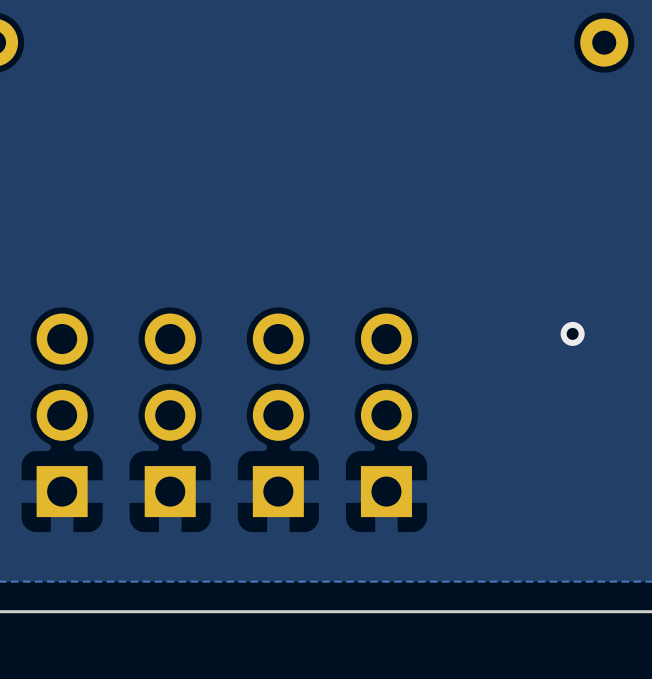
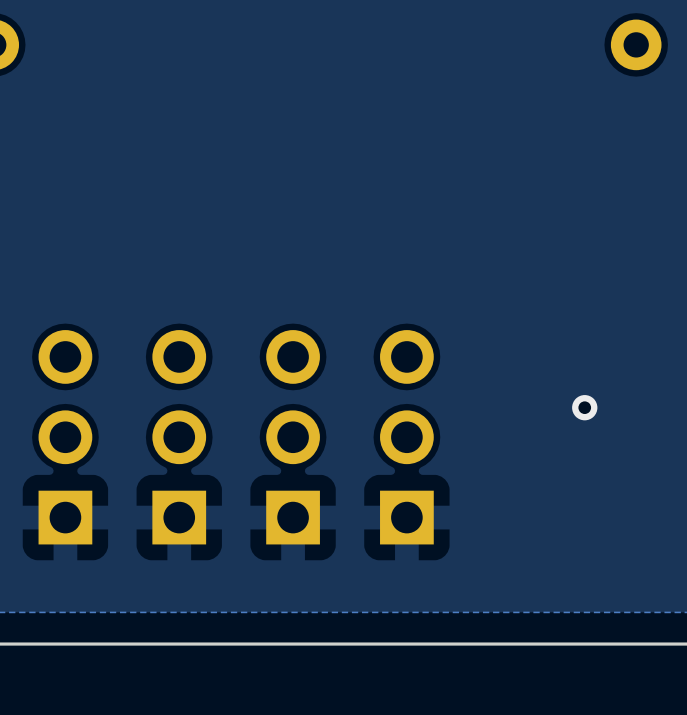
via position: (572, 333) -> (584, 407)

